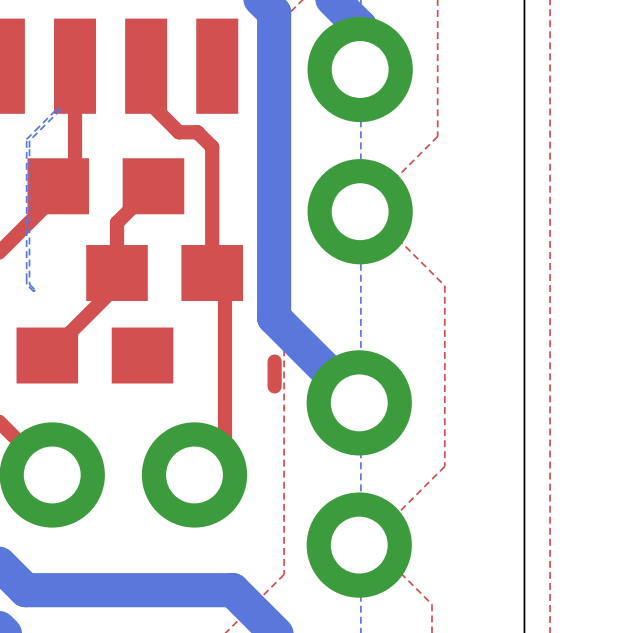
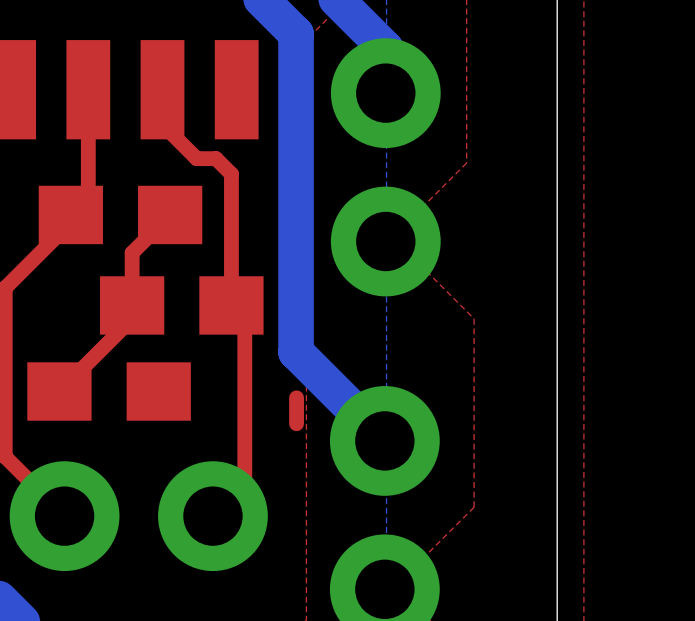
bottom zone outline: (60, 109) (29, 140) (29, 284) (35, 290) (33, 291) (26, 284) (26, 139) (56, 109) (60, 109) -> none

